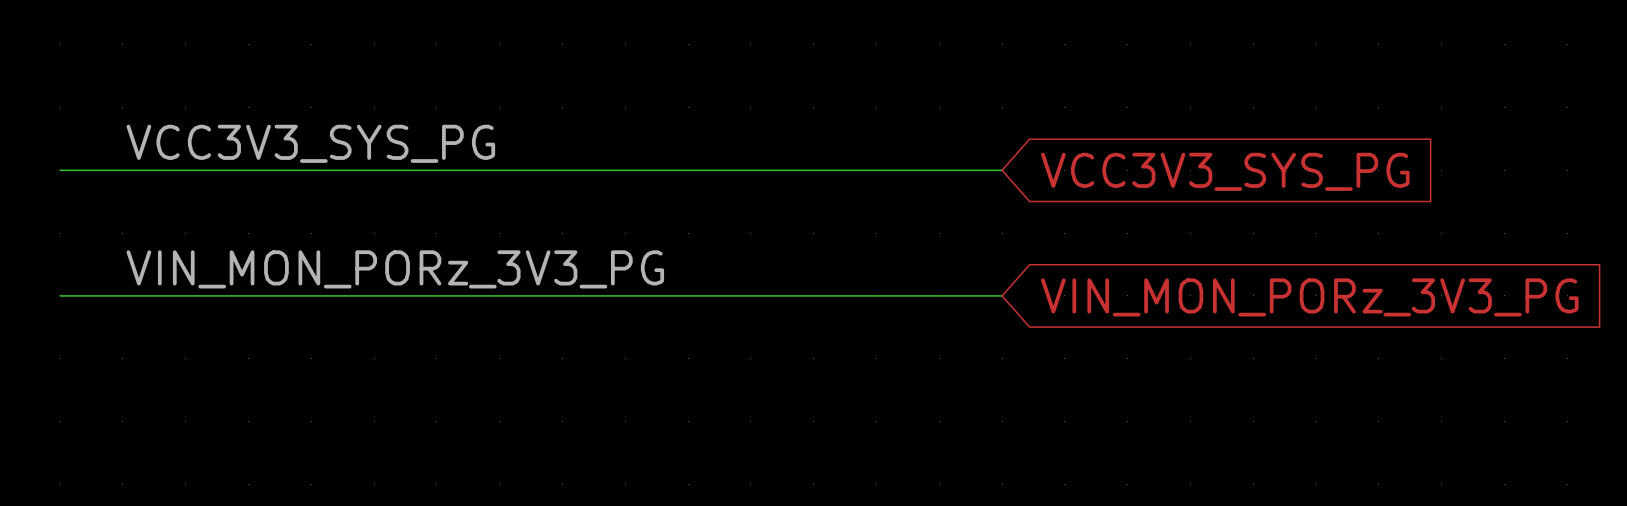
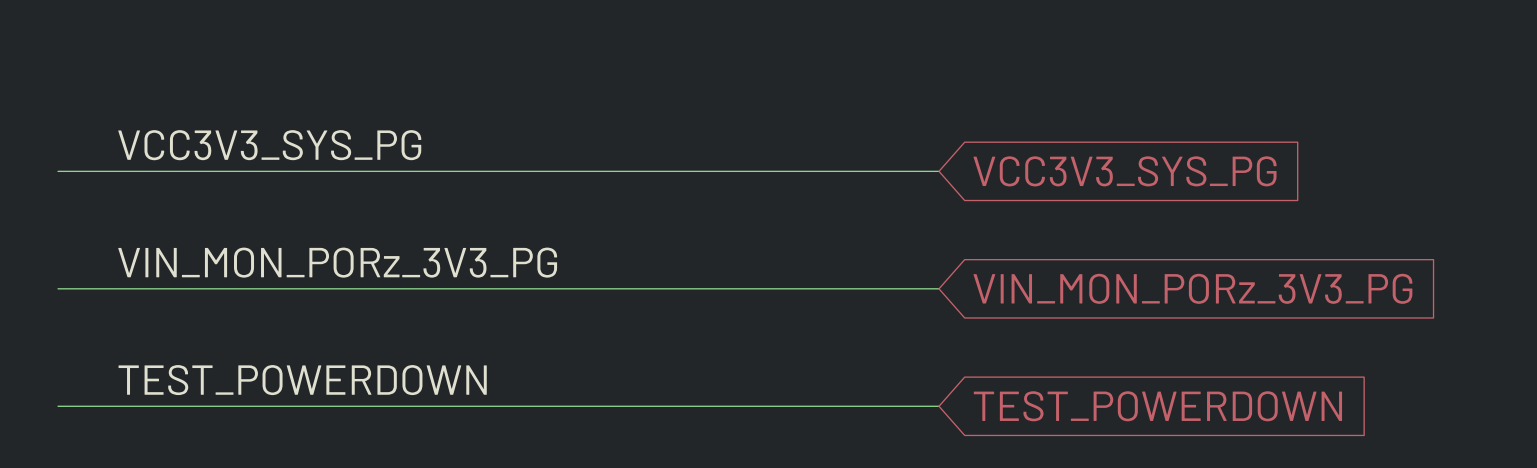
label: none -> TEST_POWERDOWN (302, 380)
wire: none -> (58, 406) (939, 406)
global label: none -> TEST_POWERDOWN (1157, 406)

